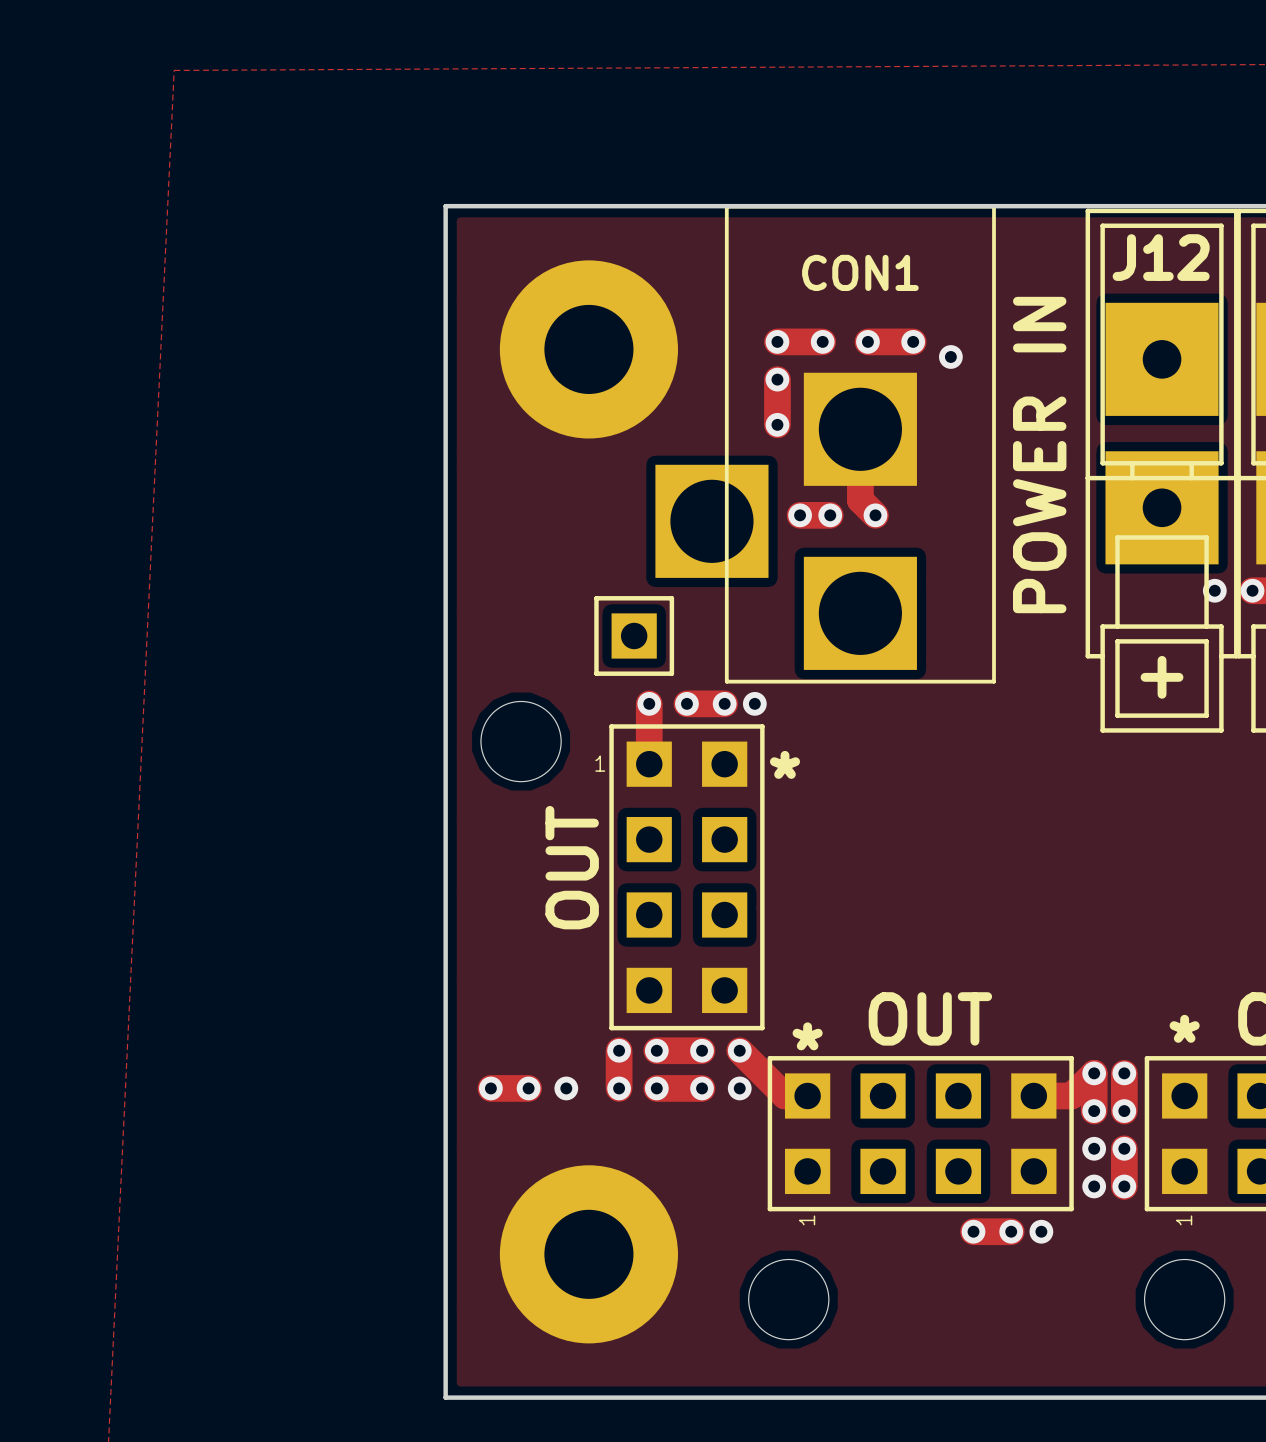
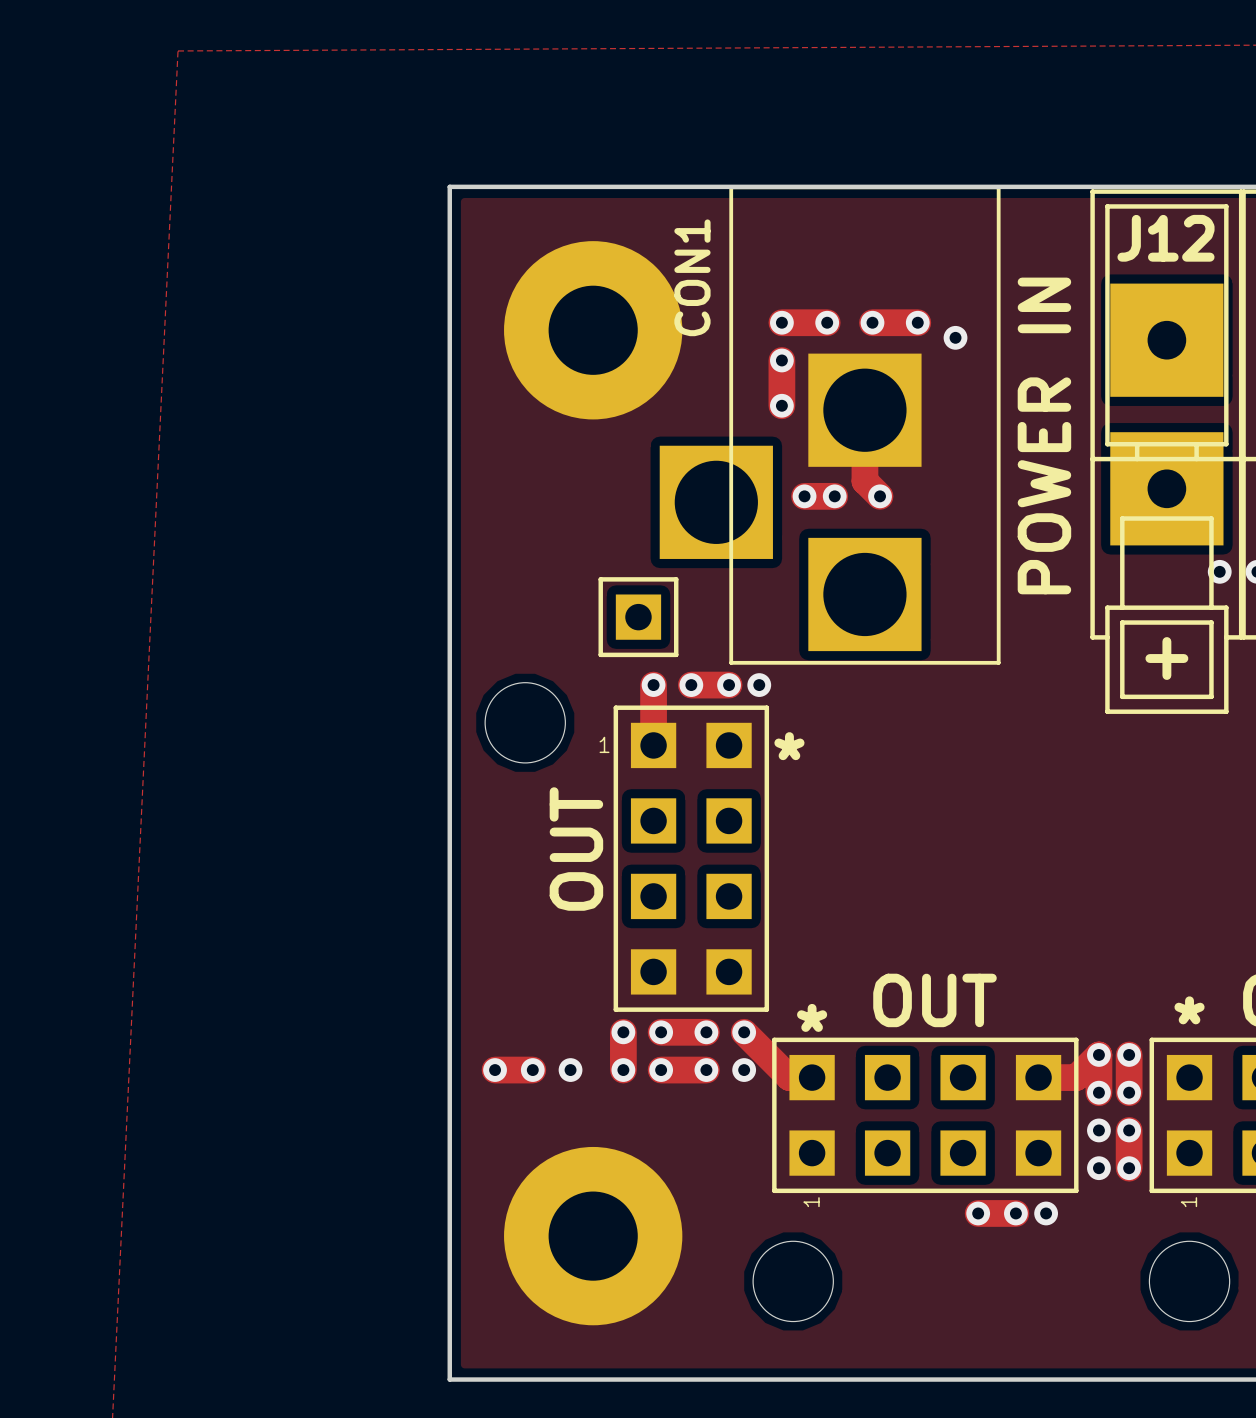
CON1 name rotation: 0° (860, 272) -> 90° counterclockwise (692, 277)
CON1 name position: CON1 (860, 272) -> CON1 (692, 277)

